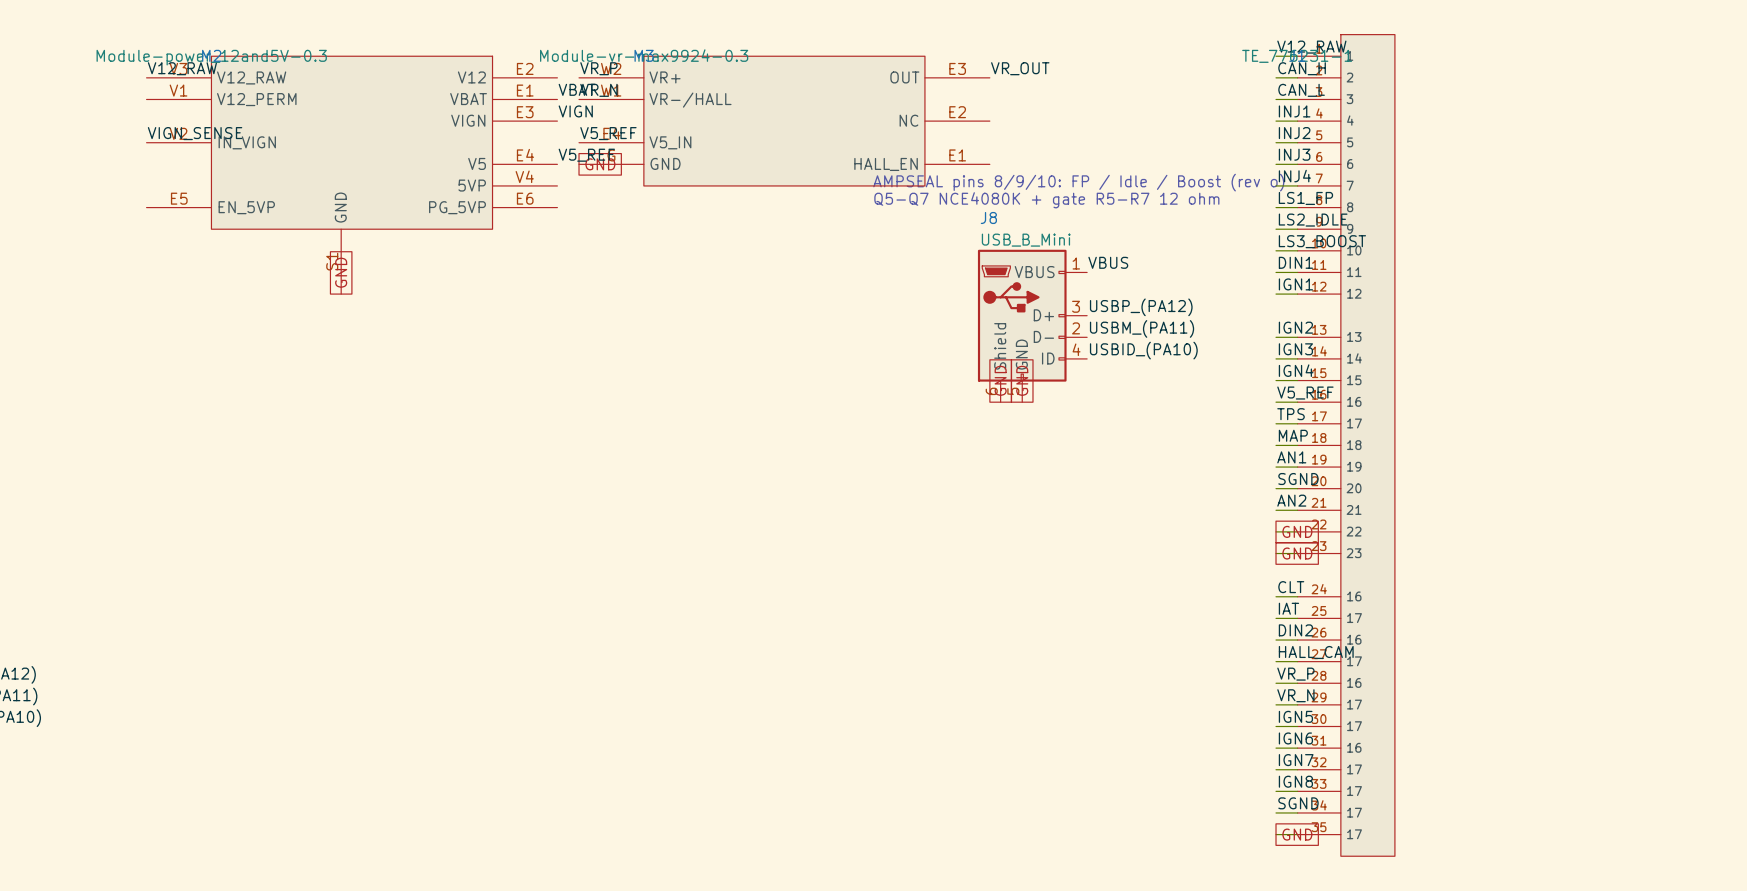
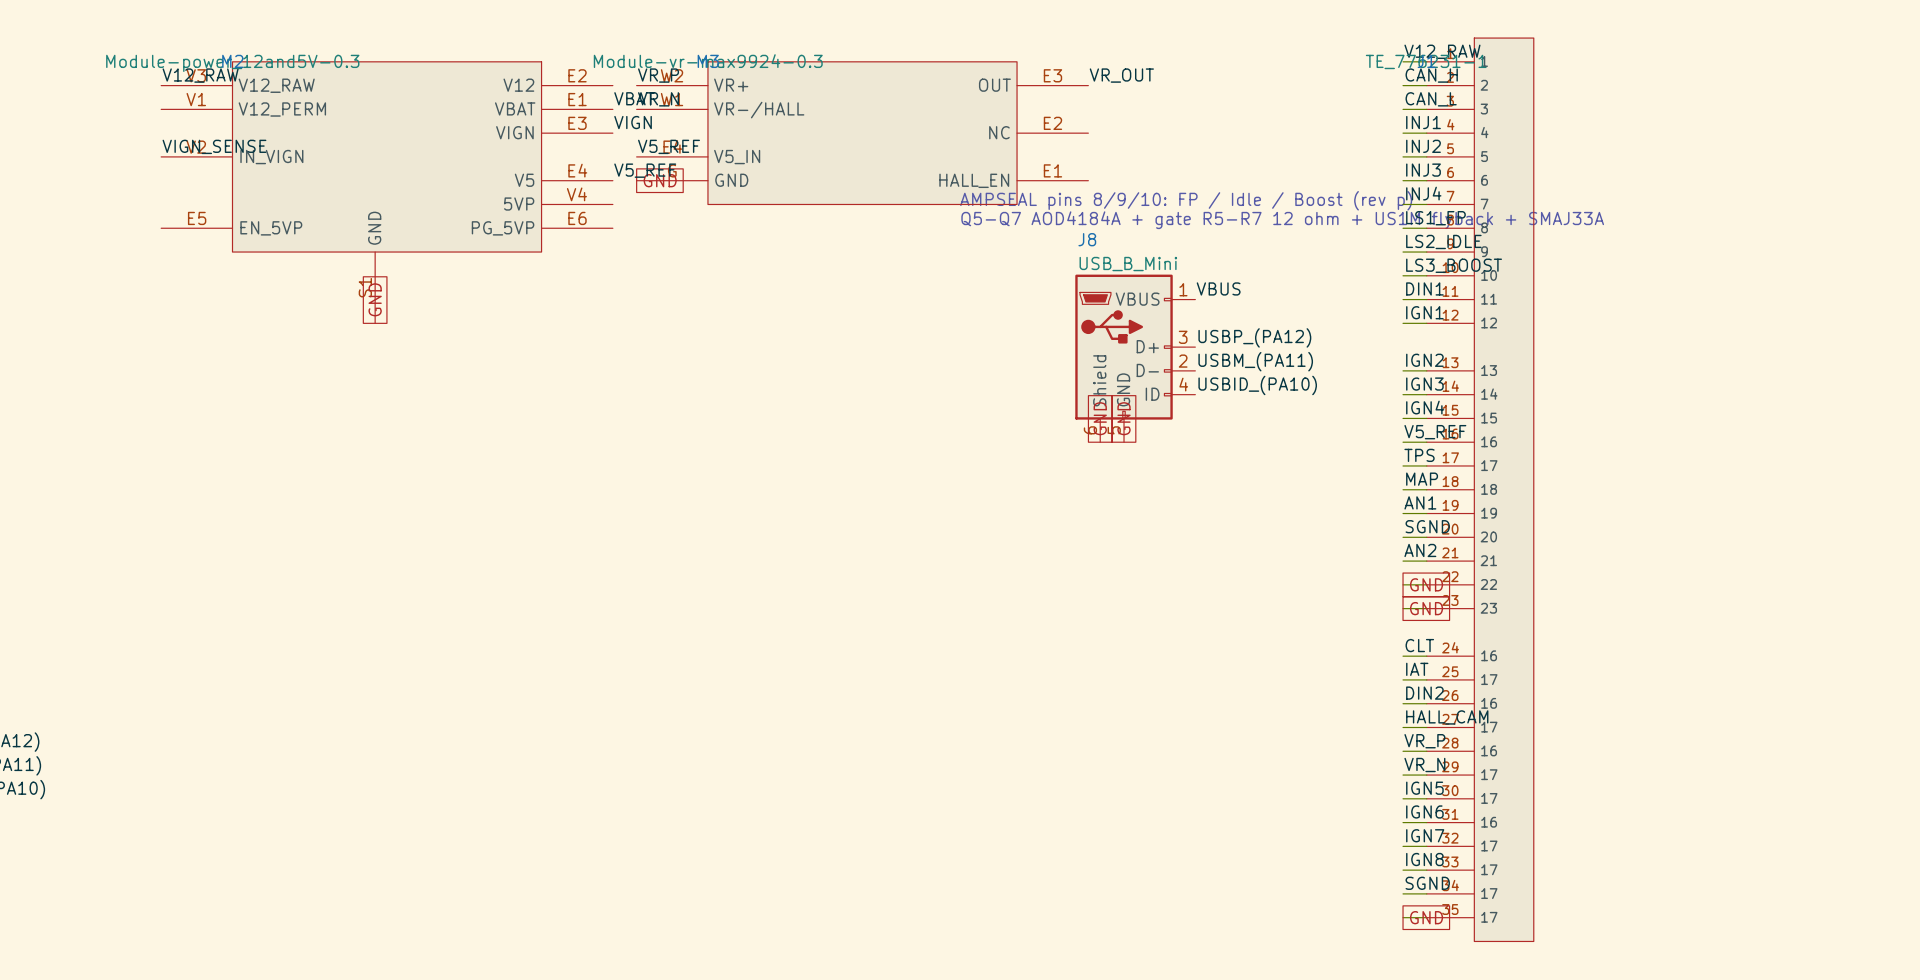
text: AMPSEAL pins 8/9/10: FP / Idle / Boost (rev o) (1078, 182) -> AMPSEAL pins 8/9/10: FP / Idle / Boost (rev p) (1186, 200)
text: Q5-Q7 NCE4080K + gate R5-R7 12 ohm (1046, 200) -> Q5-Q7 AOD4184A + gate R5-R7 12 ohm + US1M flyback + SMAJ33A (1282, 220)

